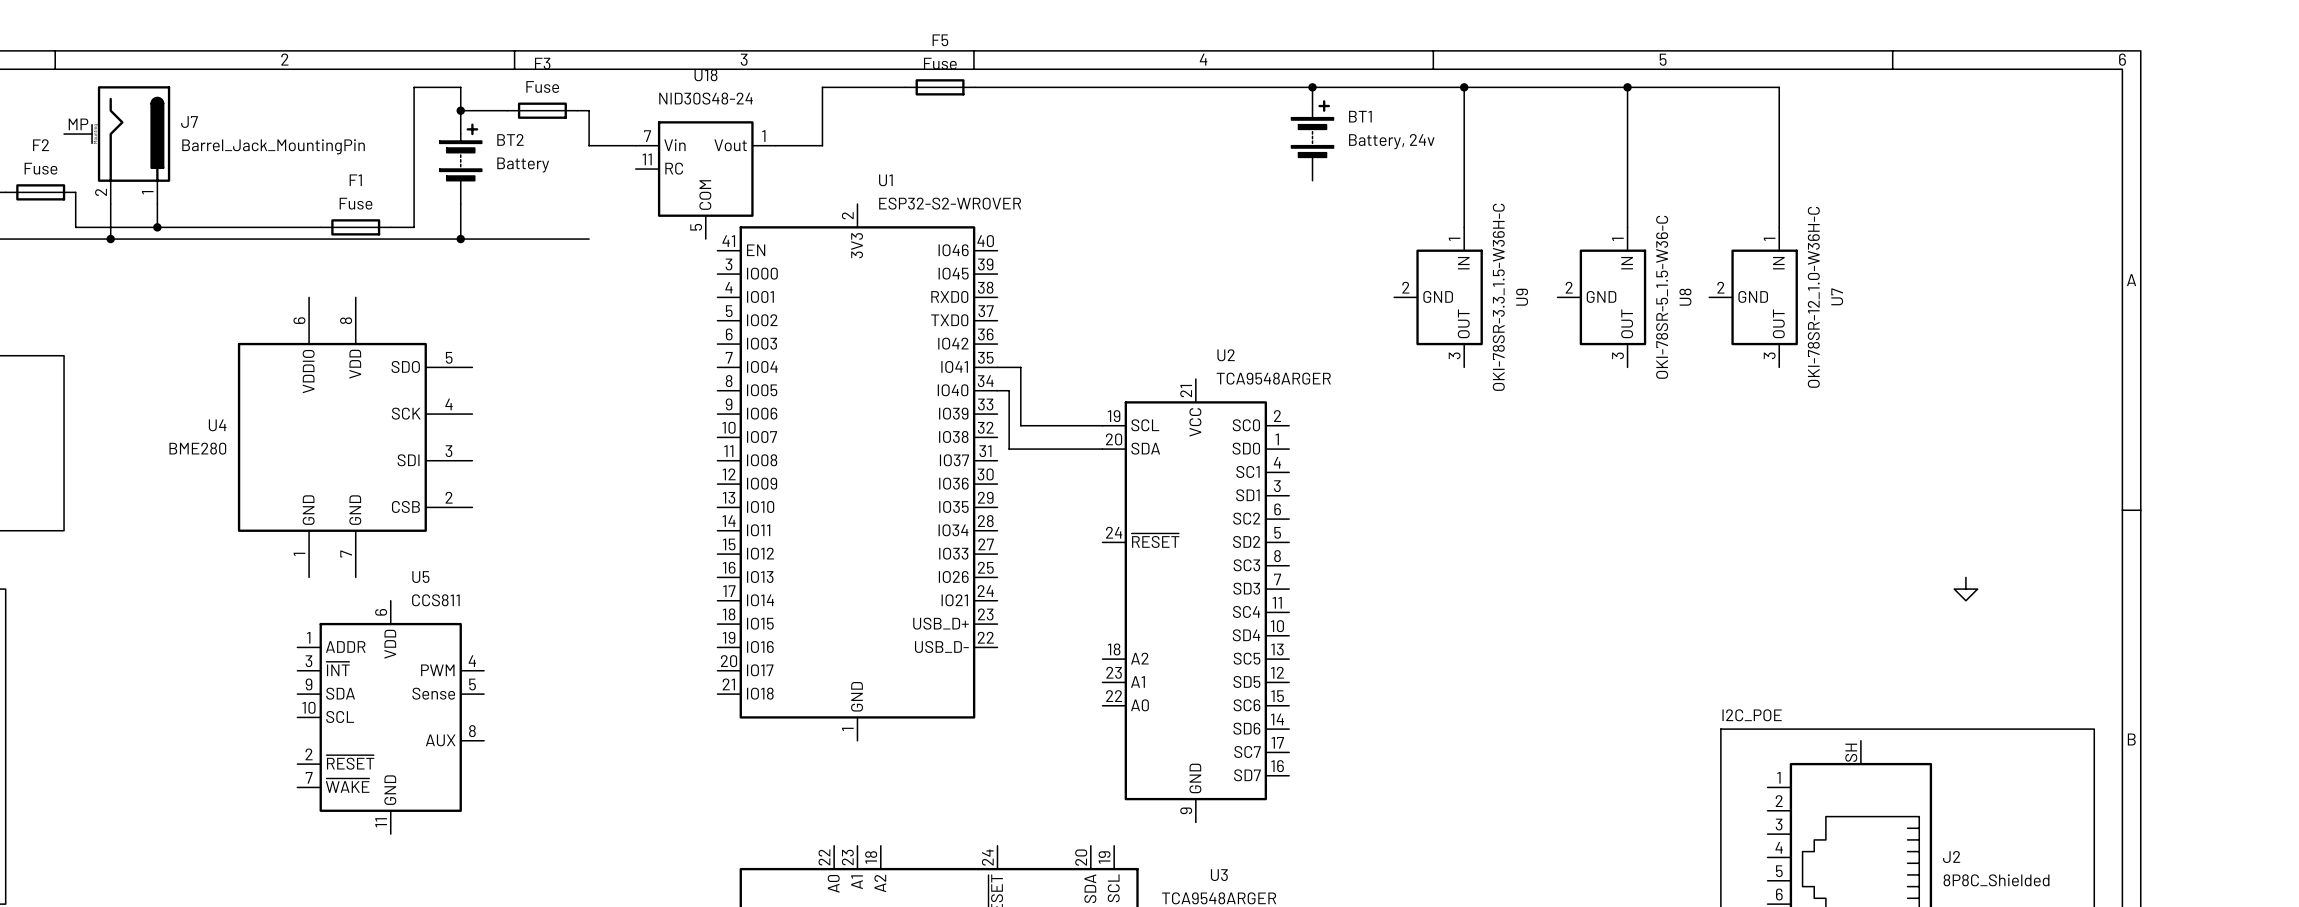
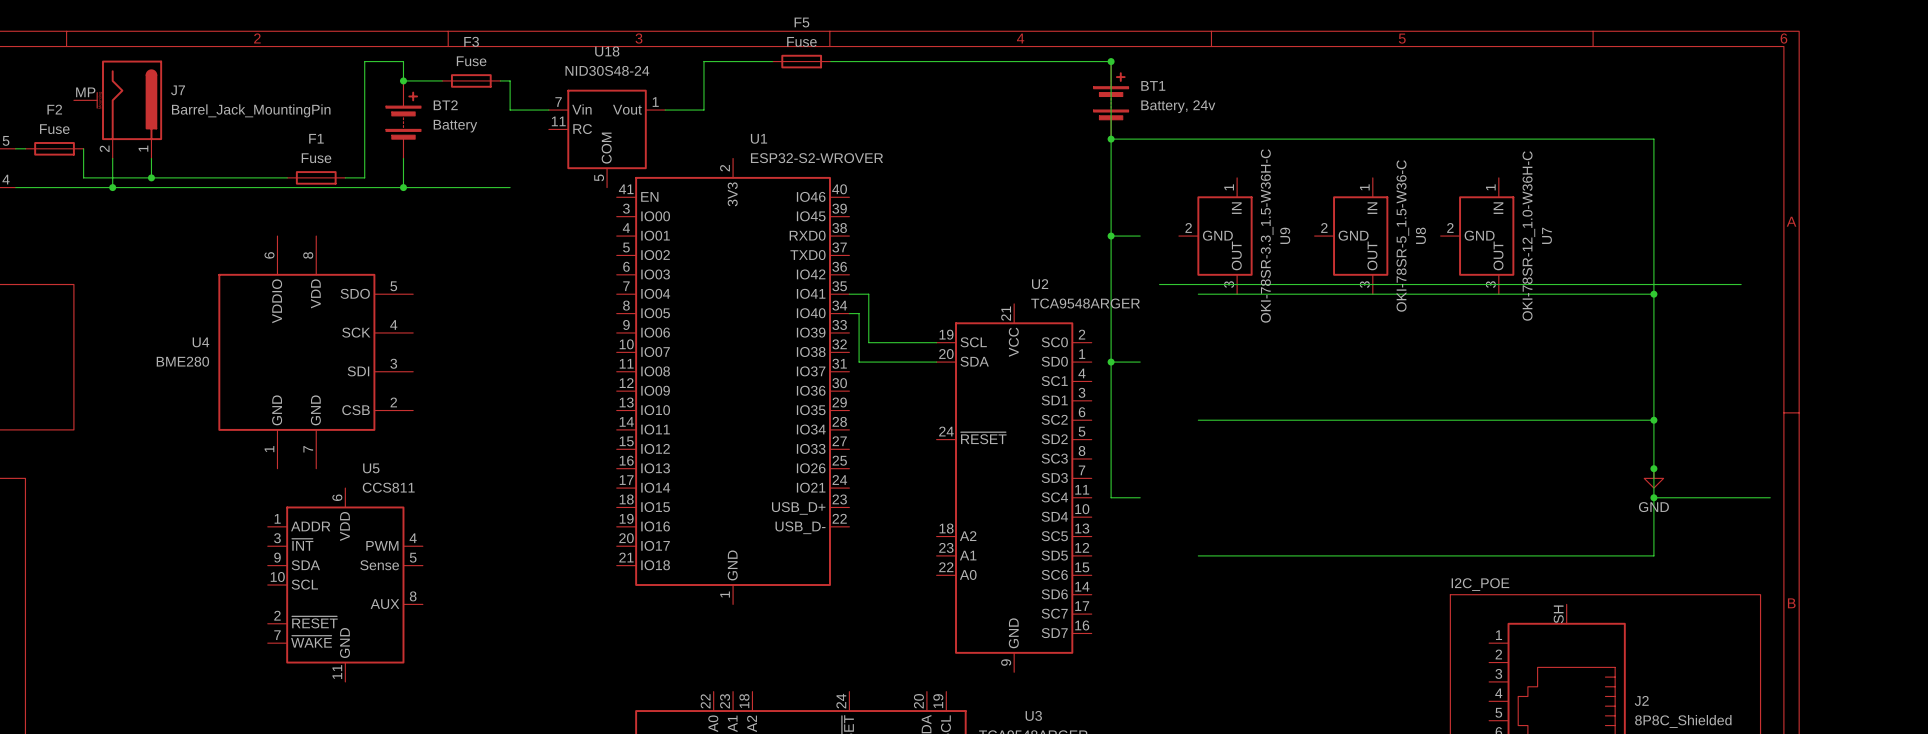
wire: (1312, 87) (1779, 87) (1779, 227) -> (1111, 61) (1111, 497) (1140, 497)
wire: (1464, 87) (1464, 227) -> none
junction: (1464, 87) -> none
wire: (1627, 87) (1627, 227) -> none
junction: (1627, 87) -> none
wire: none -> (1111, 139) (1653, 139) (1653, 555) (1198, 555)
junction: none -> (1111, 139)
wire: none -> (1111, 236) (1140, 236)
junction: none -> (1111, 236)
wire: none -> (1159, 284) (1741, 284)
wire: none -> (1198, 294) (1653, 294)
junction: none -> (1653, 294)
wire: none -> (1111, 362) (1140, 362)
junction: none -> (1111, 362)
wire: none -> (1198, 420) (1653, 420)
junction: none -> (1653, 420)
junction: none -> (1653, 468)
wire: none -> (1653, 497) (1770, 497)
junction: none -> (1653, 497)
power symbol text: none -> GND (1653, 507)

